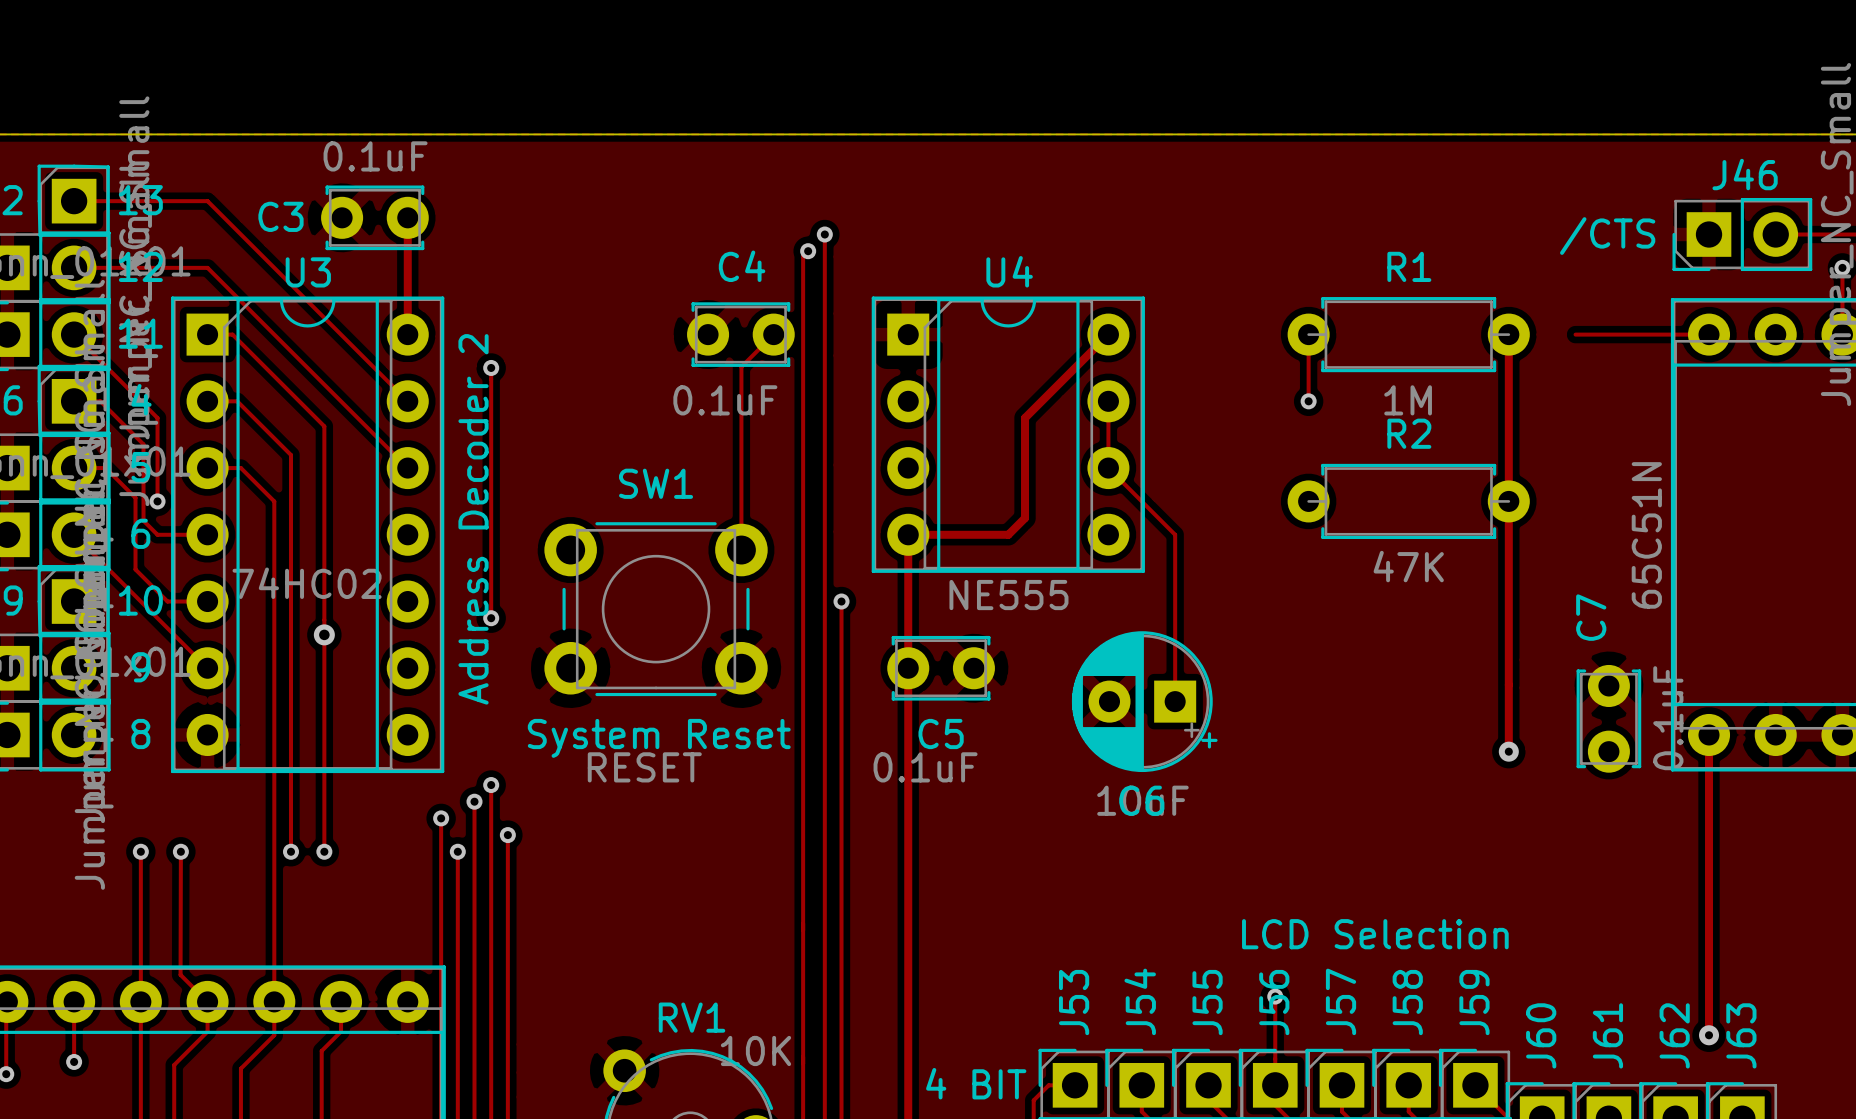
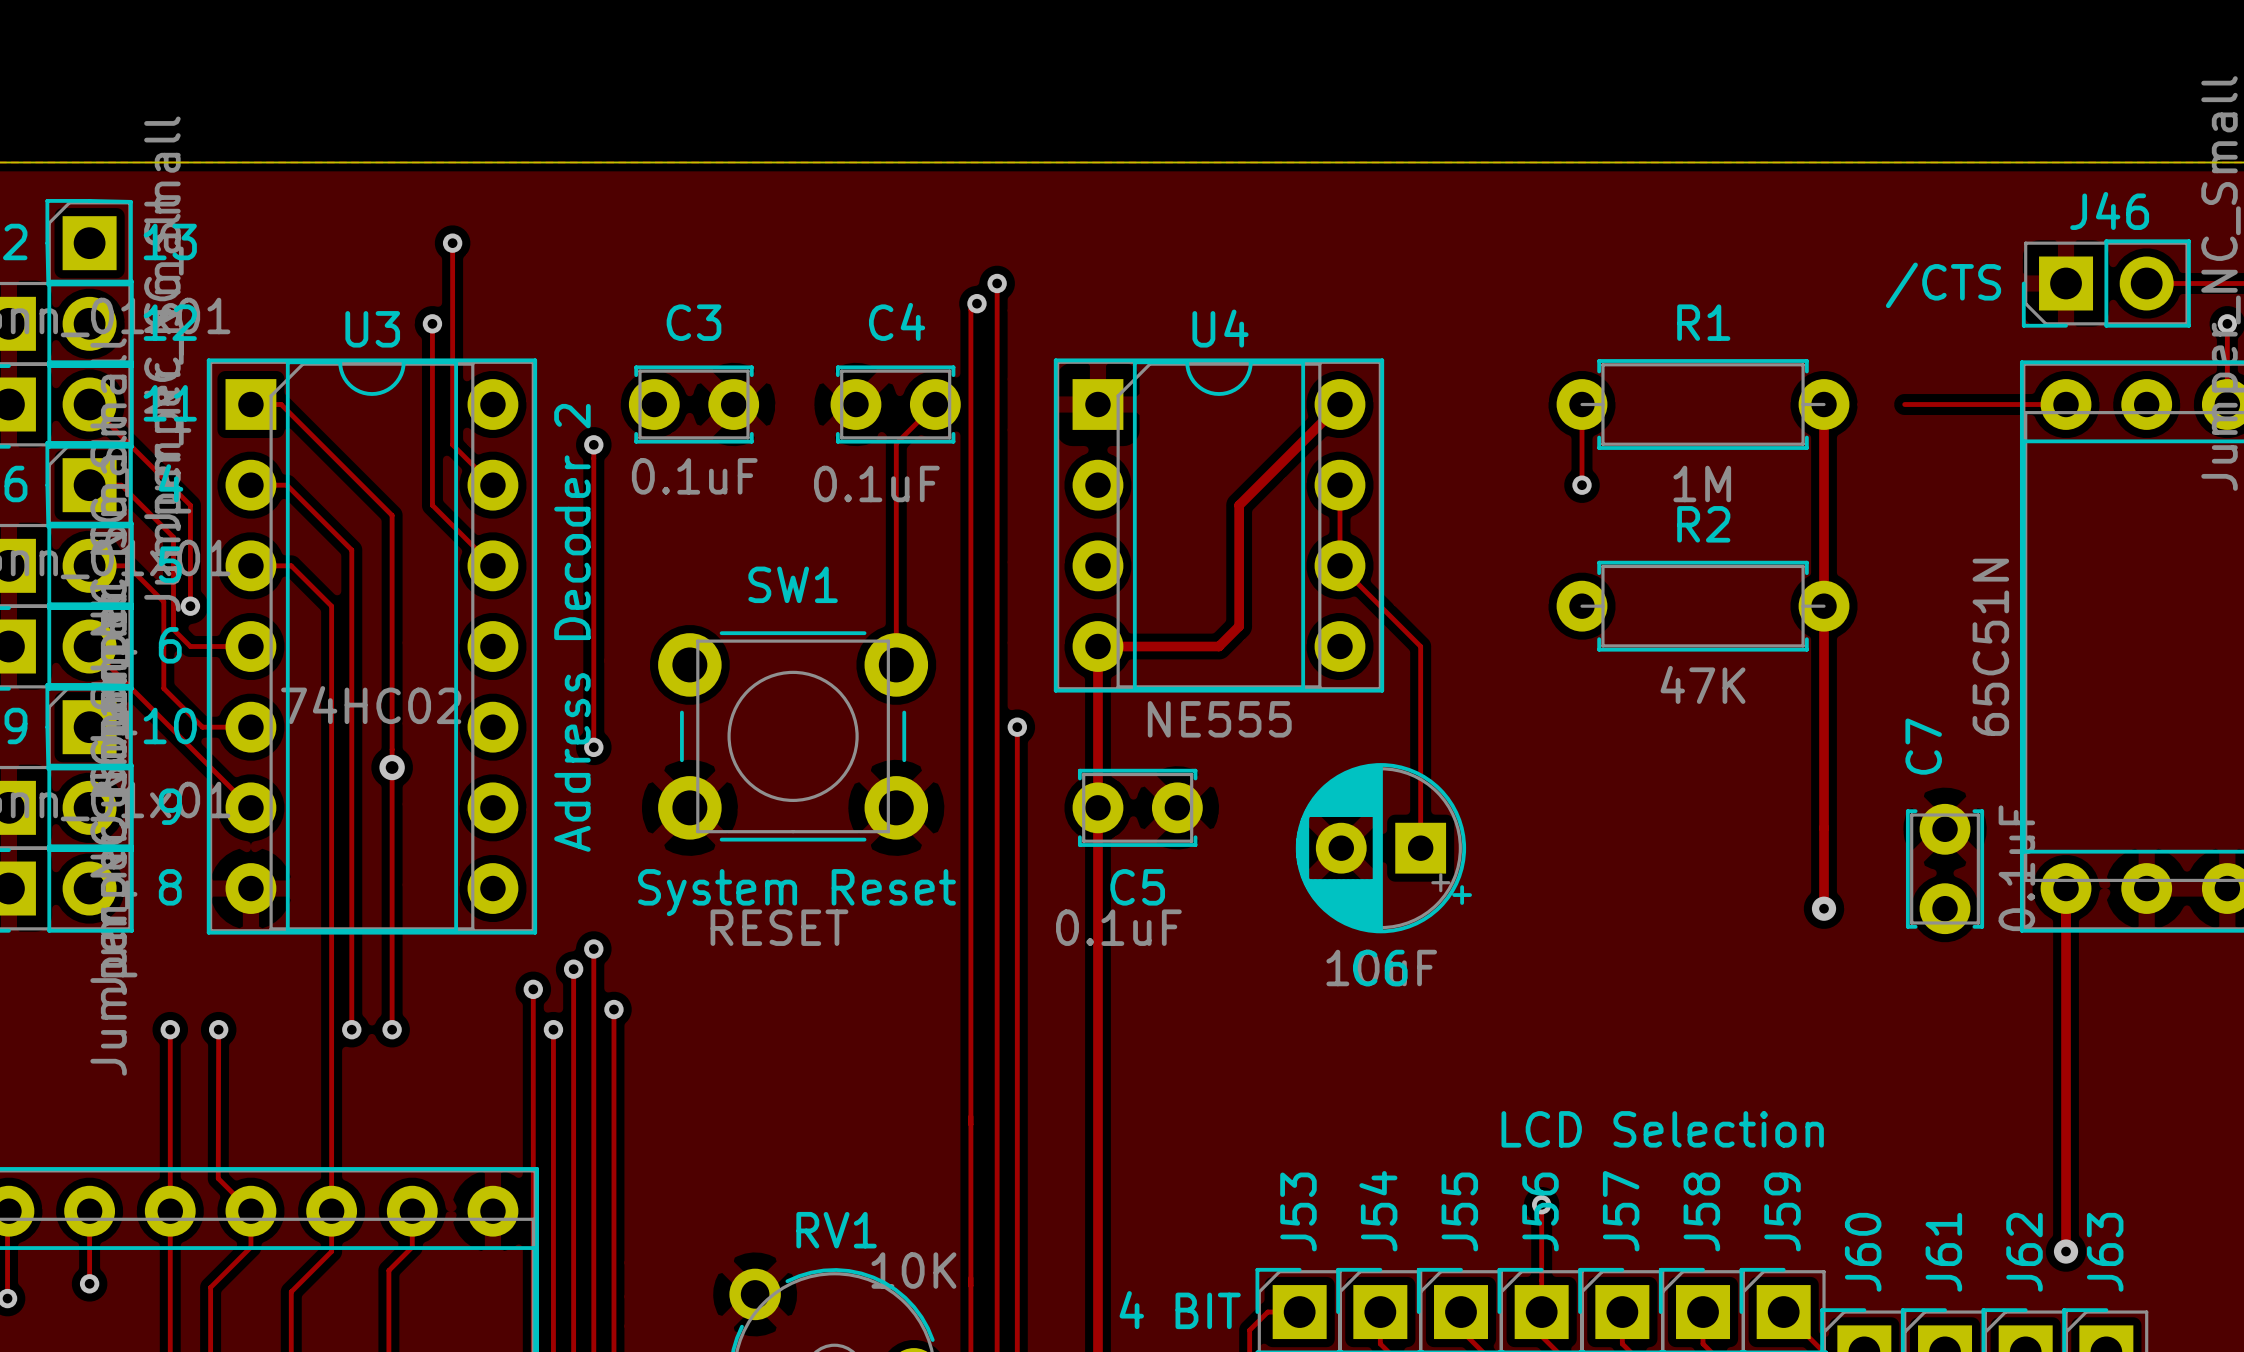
C3 value position: 0.1uF (375, 156) -> 0.1uF (694, 476)
track: (74, 201) (207, 201) (374, 367) -> (452, 243) (452, 444)
via: none -> (452, 243)
C3 name position: C3 (280, 216) -> C3 (693, 322)
C3 position: (374, 217) -> (693, 404)
track: (407, 217) (407, 334) -> none
track: (74, 267) (207, 267) (357, 418) -> (432, 323) (432, 505)
via: none -> (432, 323)

